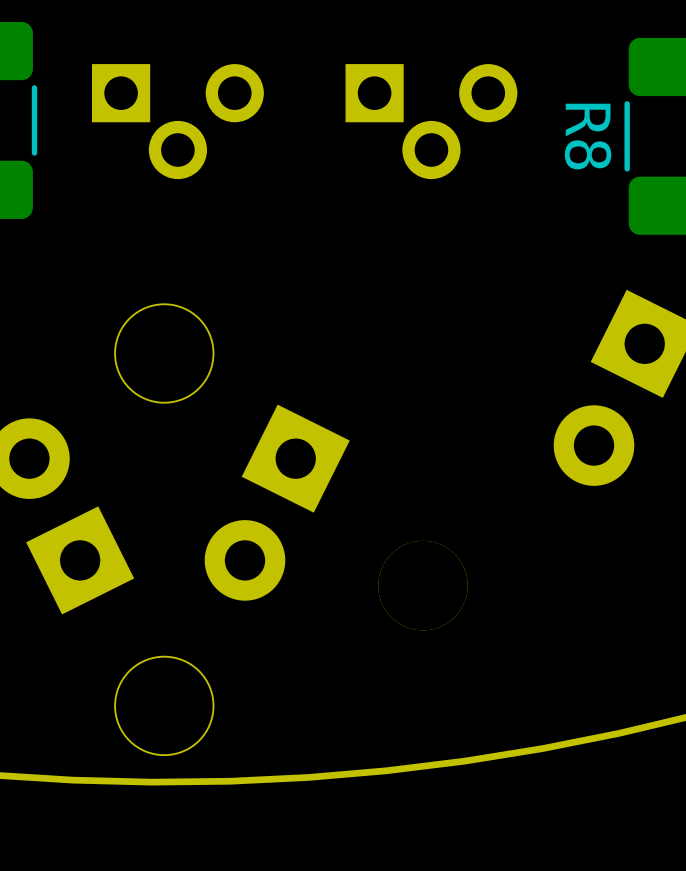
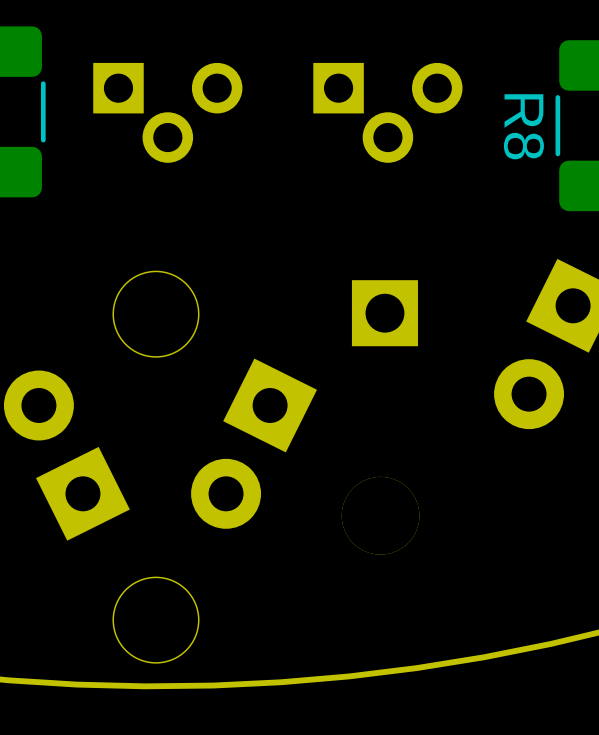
part: none -> (384, 313)

